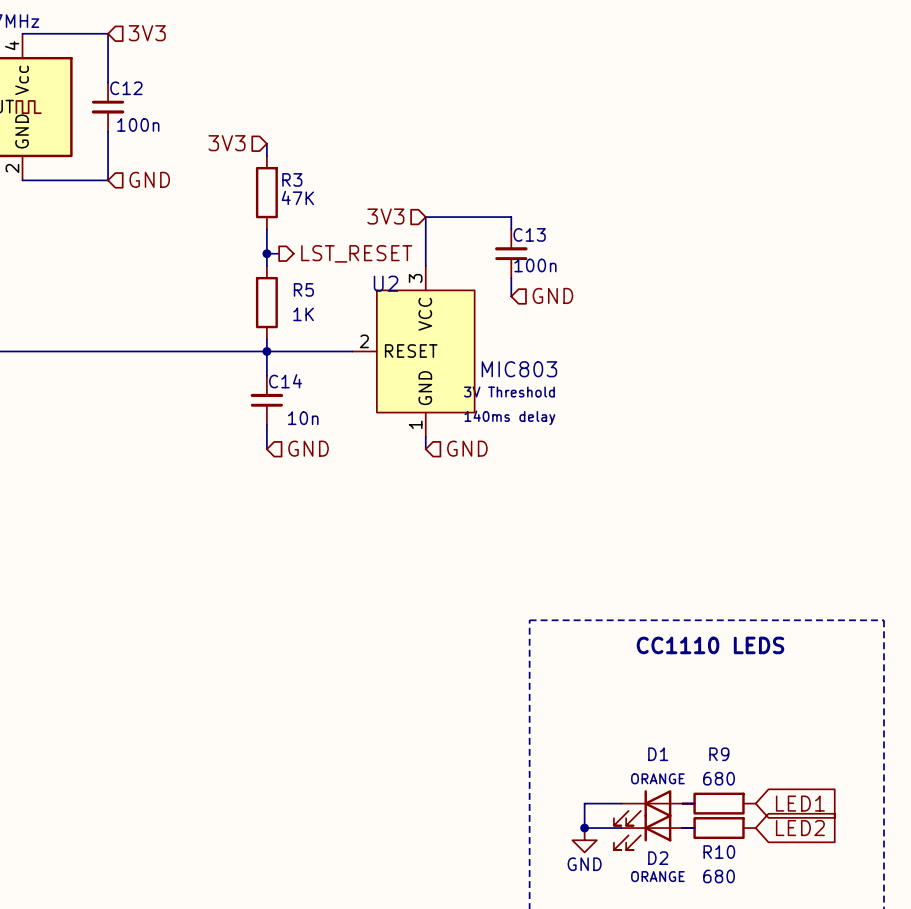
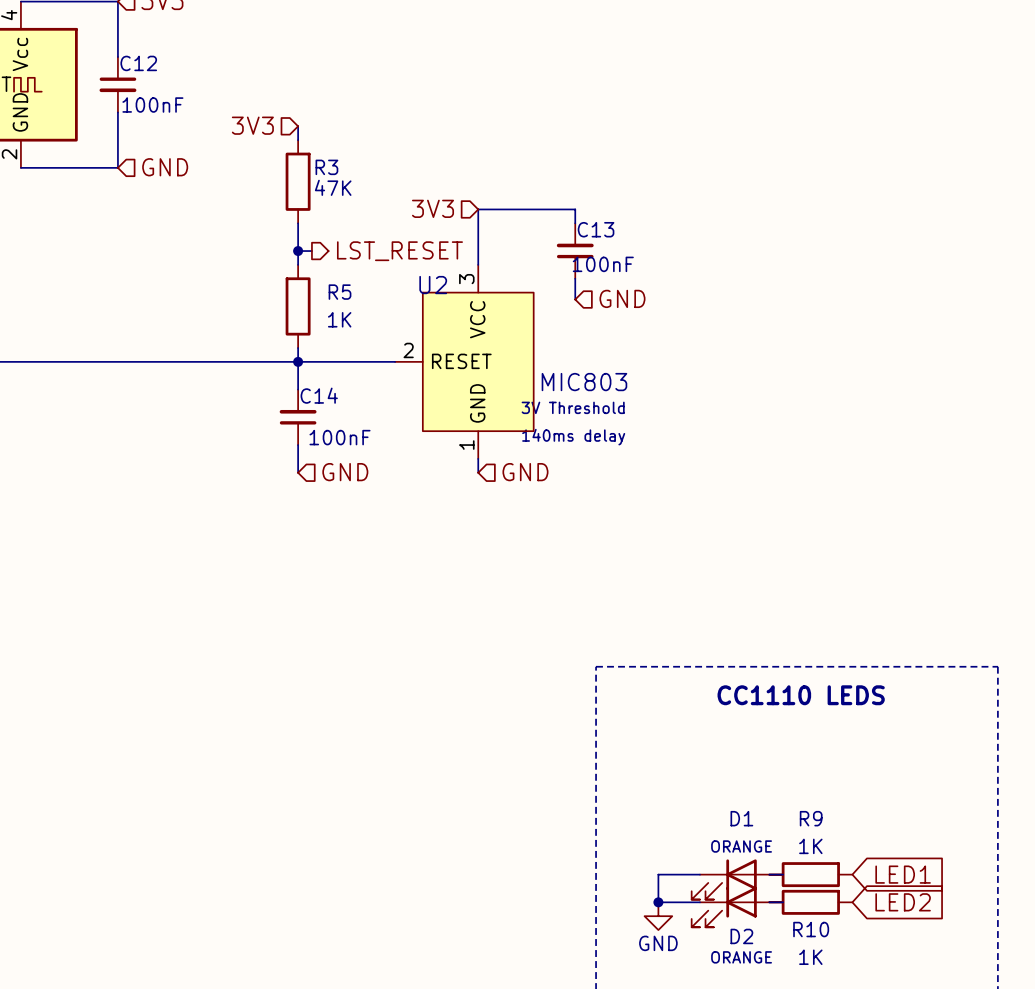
C12 value: 100n (138, 124) -> 100nF (152, 105)
C13 value: 100n (535, 265) -> 100nF (603, 264)
C14 value: 10n (303, 418) -> 100nF (340, 437)
R9 value: 680 (719, 778) -> 1K (810, 846)
R10 value: 680 (719, 876) -> 1K (810, 957)

